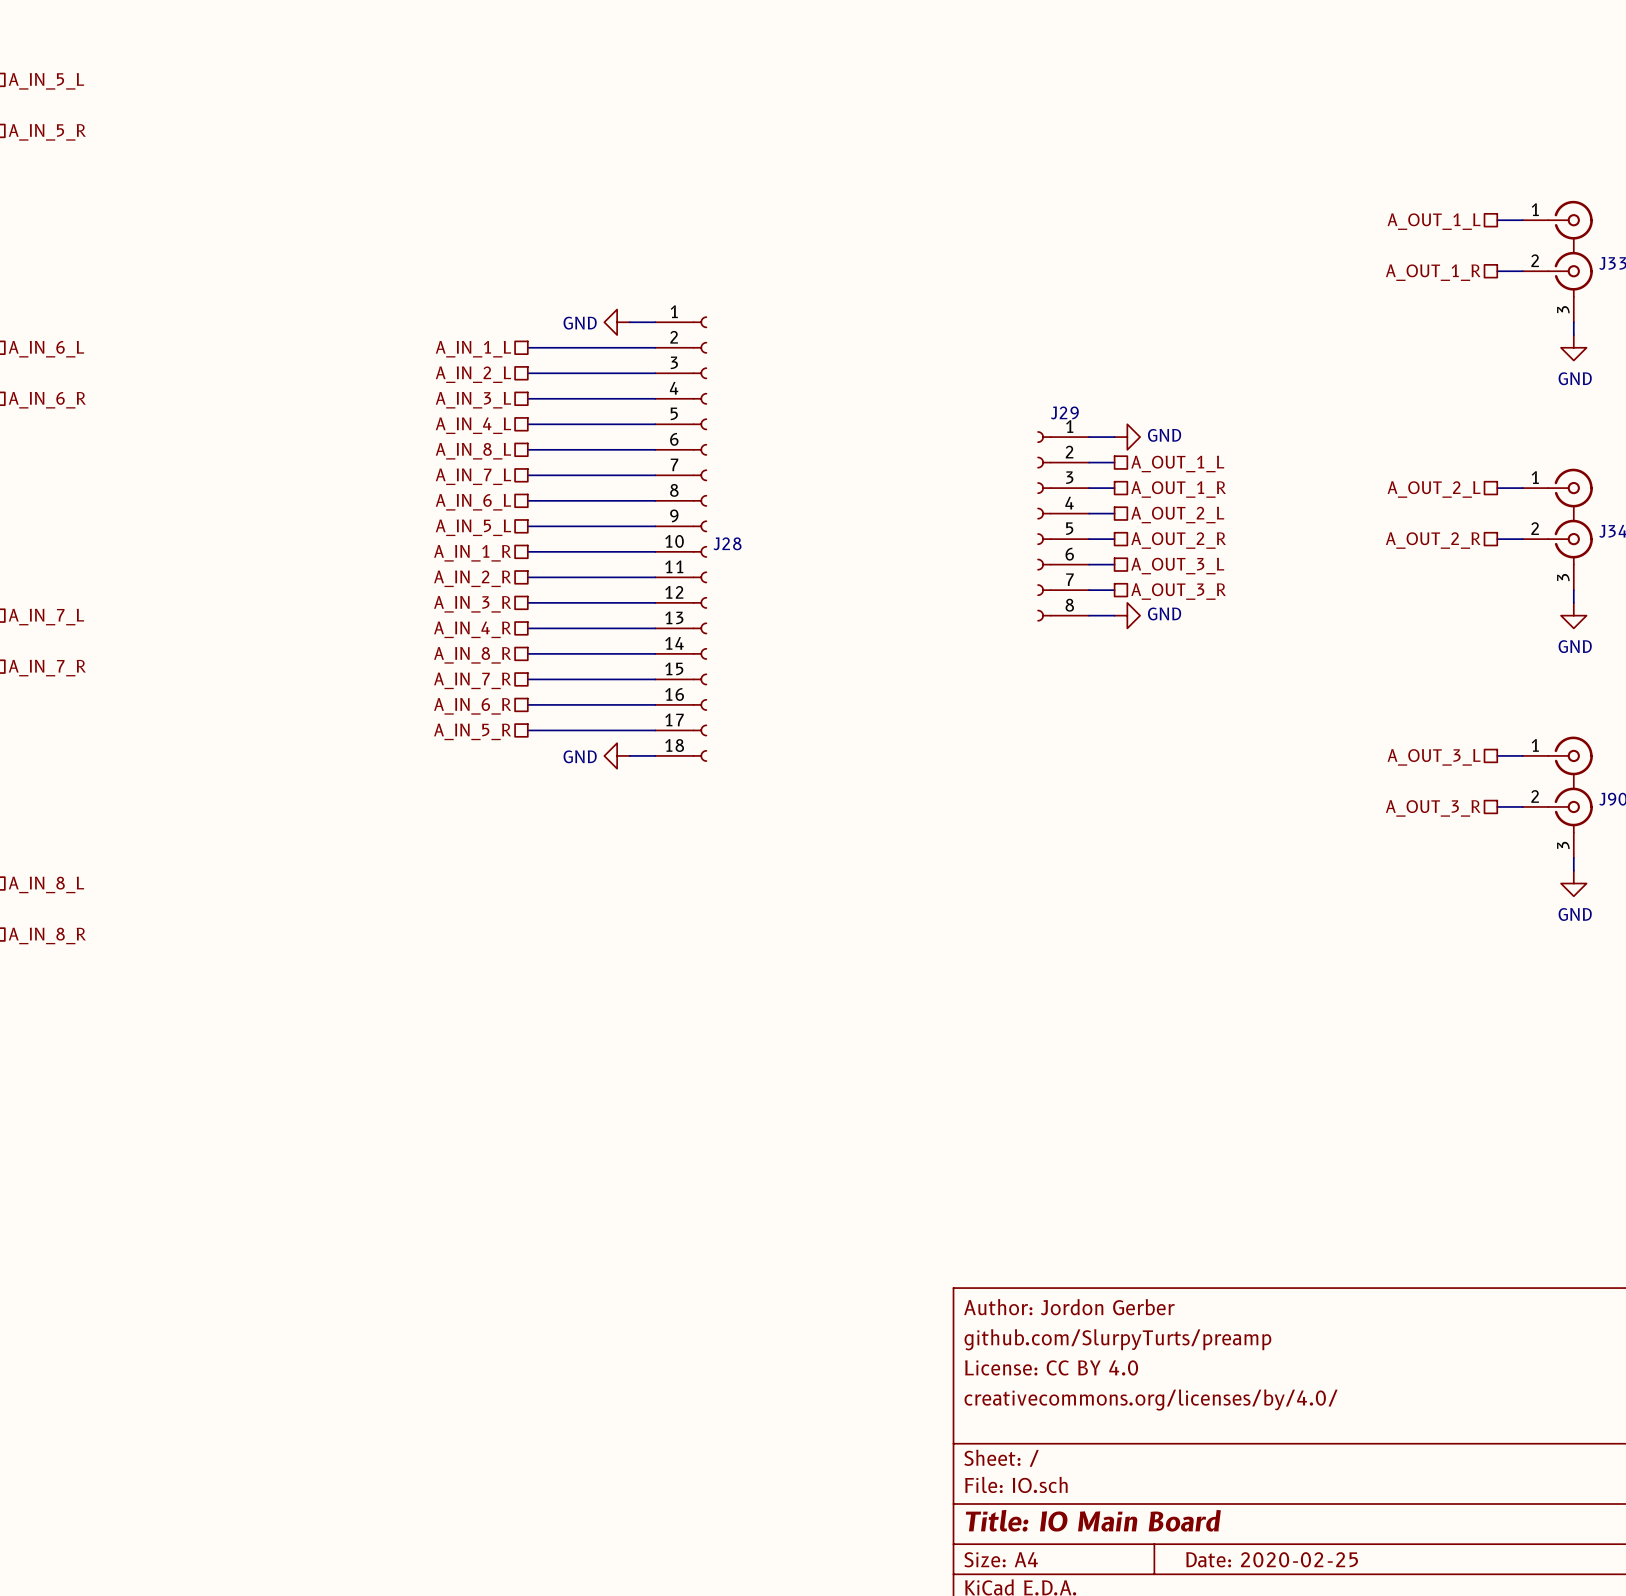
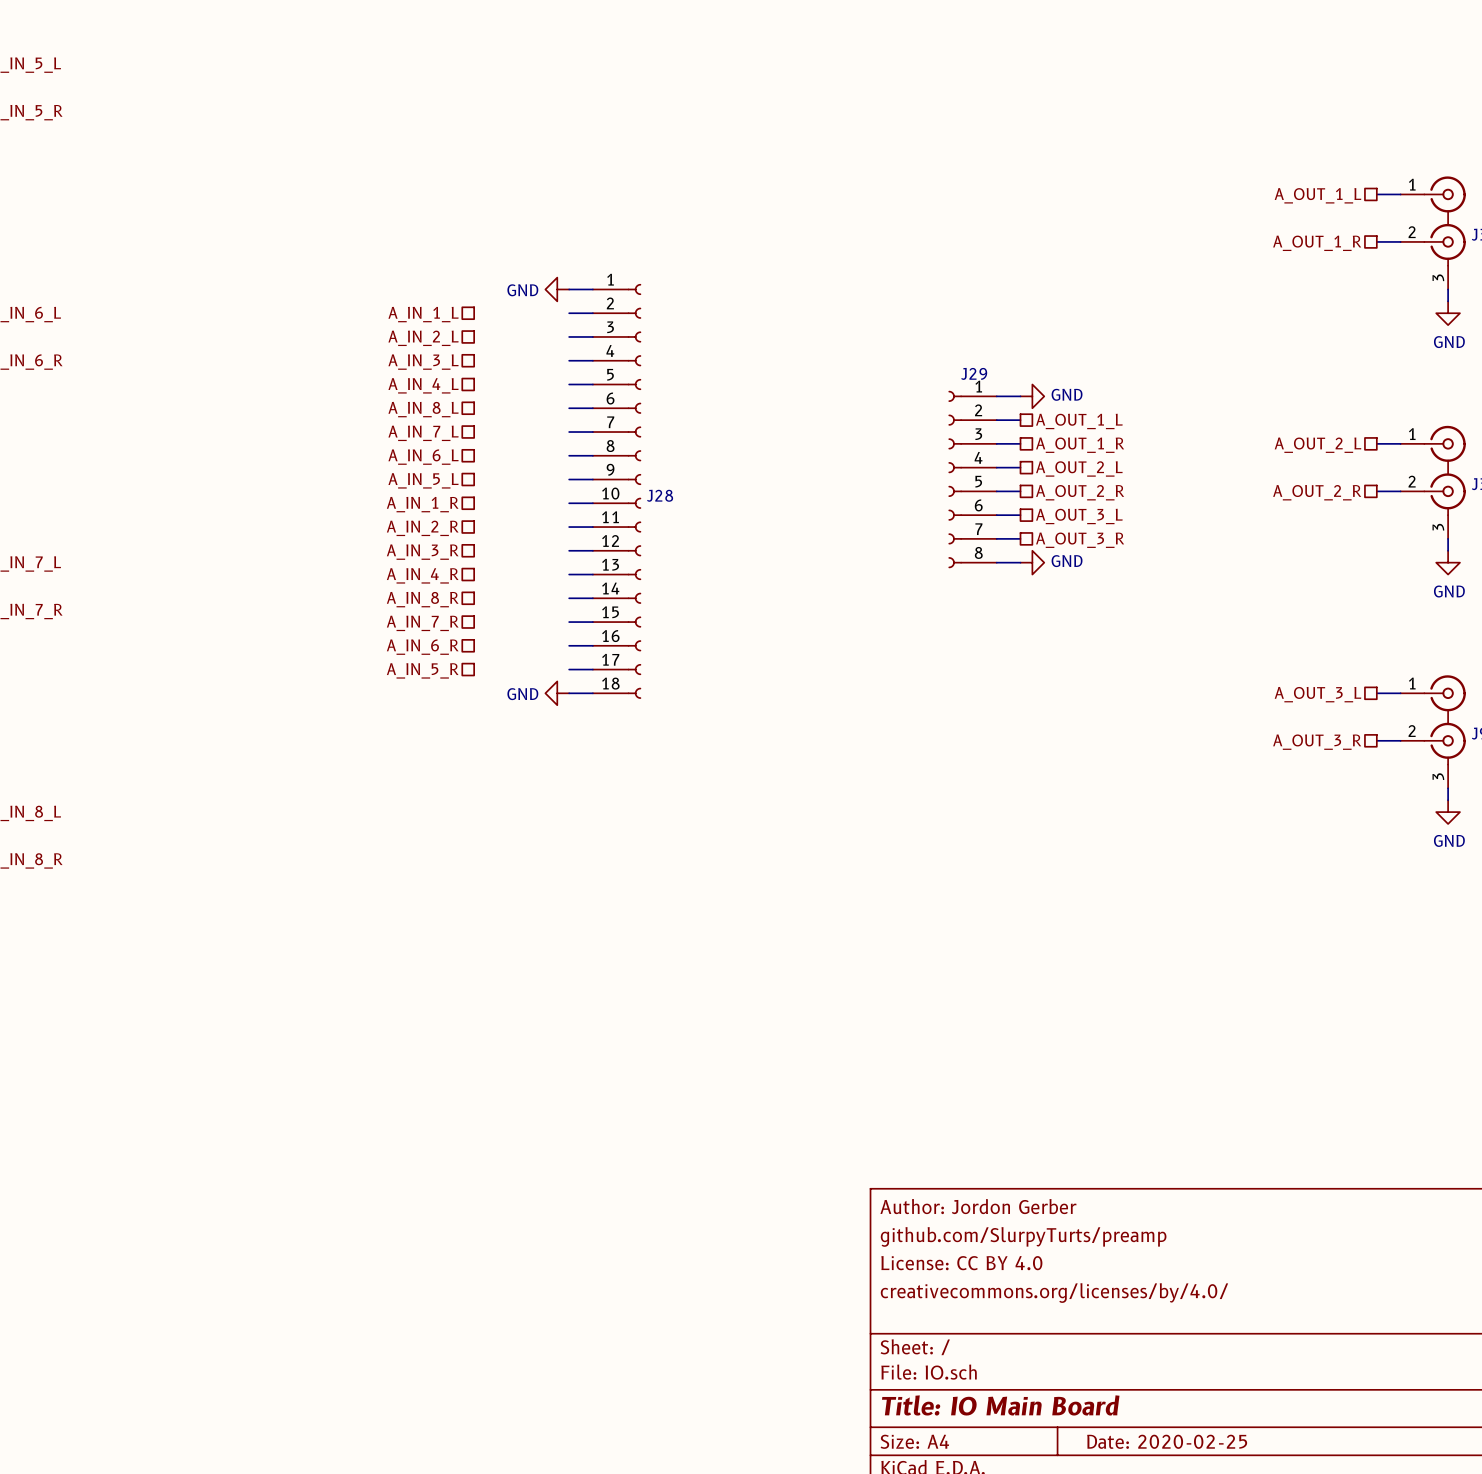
wire: (527, 347) (629, 347) -> none
wire: (527, 373) (629, 373) -> none
wire: (527, 398) (629, 398) -> none
wire: (527, 424) (629, 424) -> none
wire: (527, 449) (629, 449) -> none
wire: (527, 475) (629, 475) -> none
wire: (527, 500) (629, 500) -> none
wire: (527, 526) (629, 526) -> none
wire: (527, 551) (629, 551) -> none
wire: (527, 577) (629, 577) -> none
wire: (527, 602) (629, 602) -> none
wire: (527, 628) (629, 628) -> none
wire: (527, 653) (629, 653) -> none
wire: (527, 679) (629, 679) -> none
wire: (527, 704) (629, 704) -> none
wire: (527, 730) (629, 730) -> none

